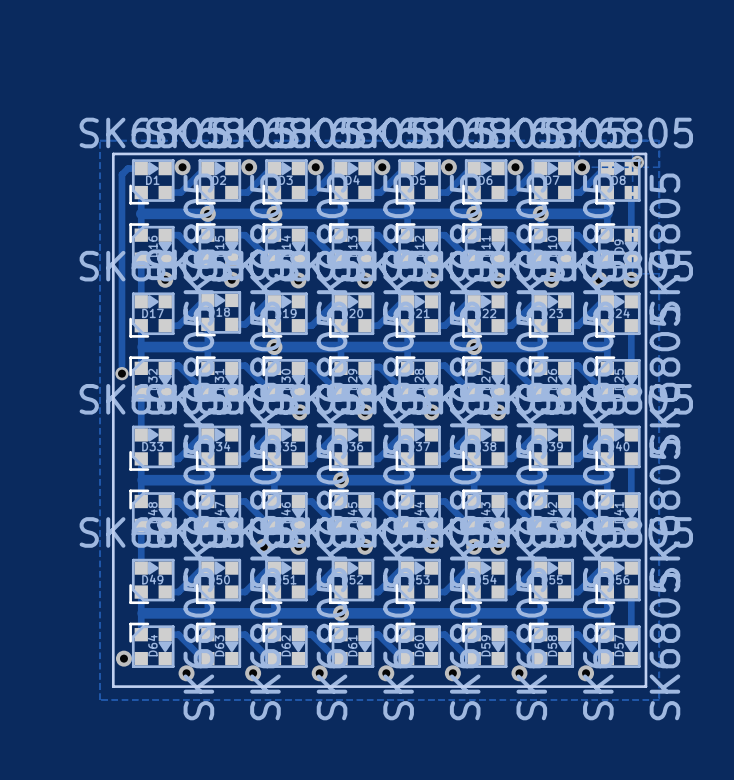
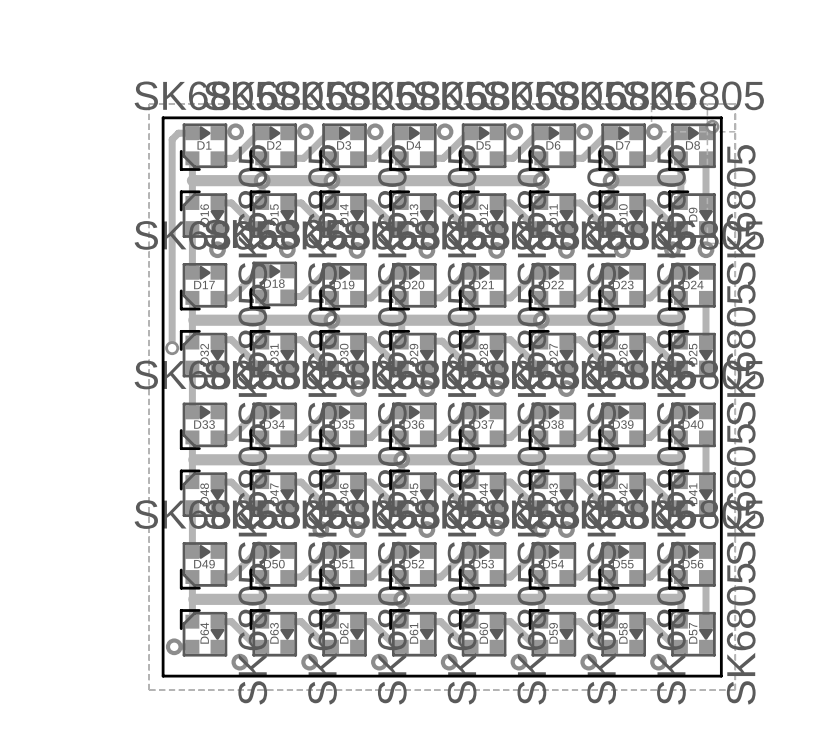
track: (474, 213) (540, 213) -> none

